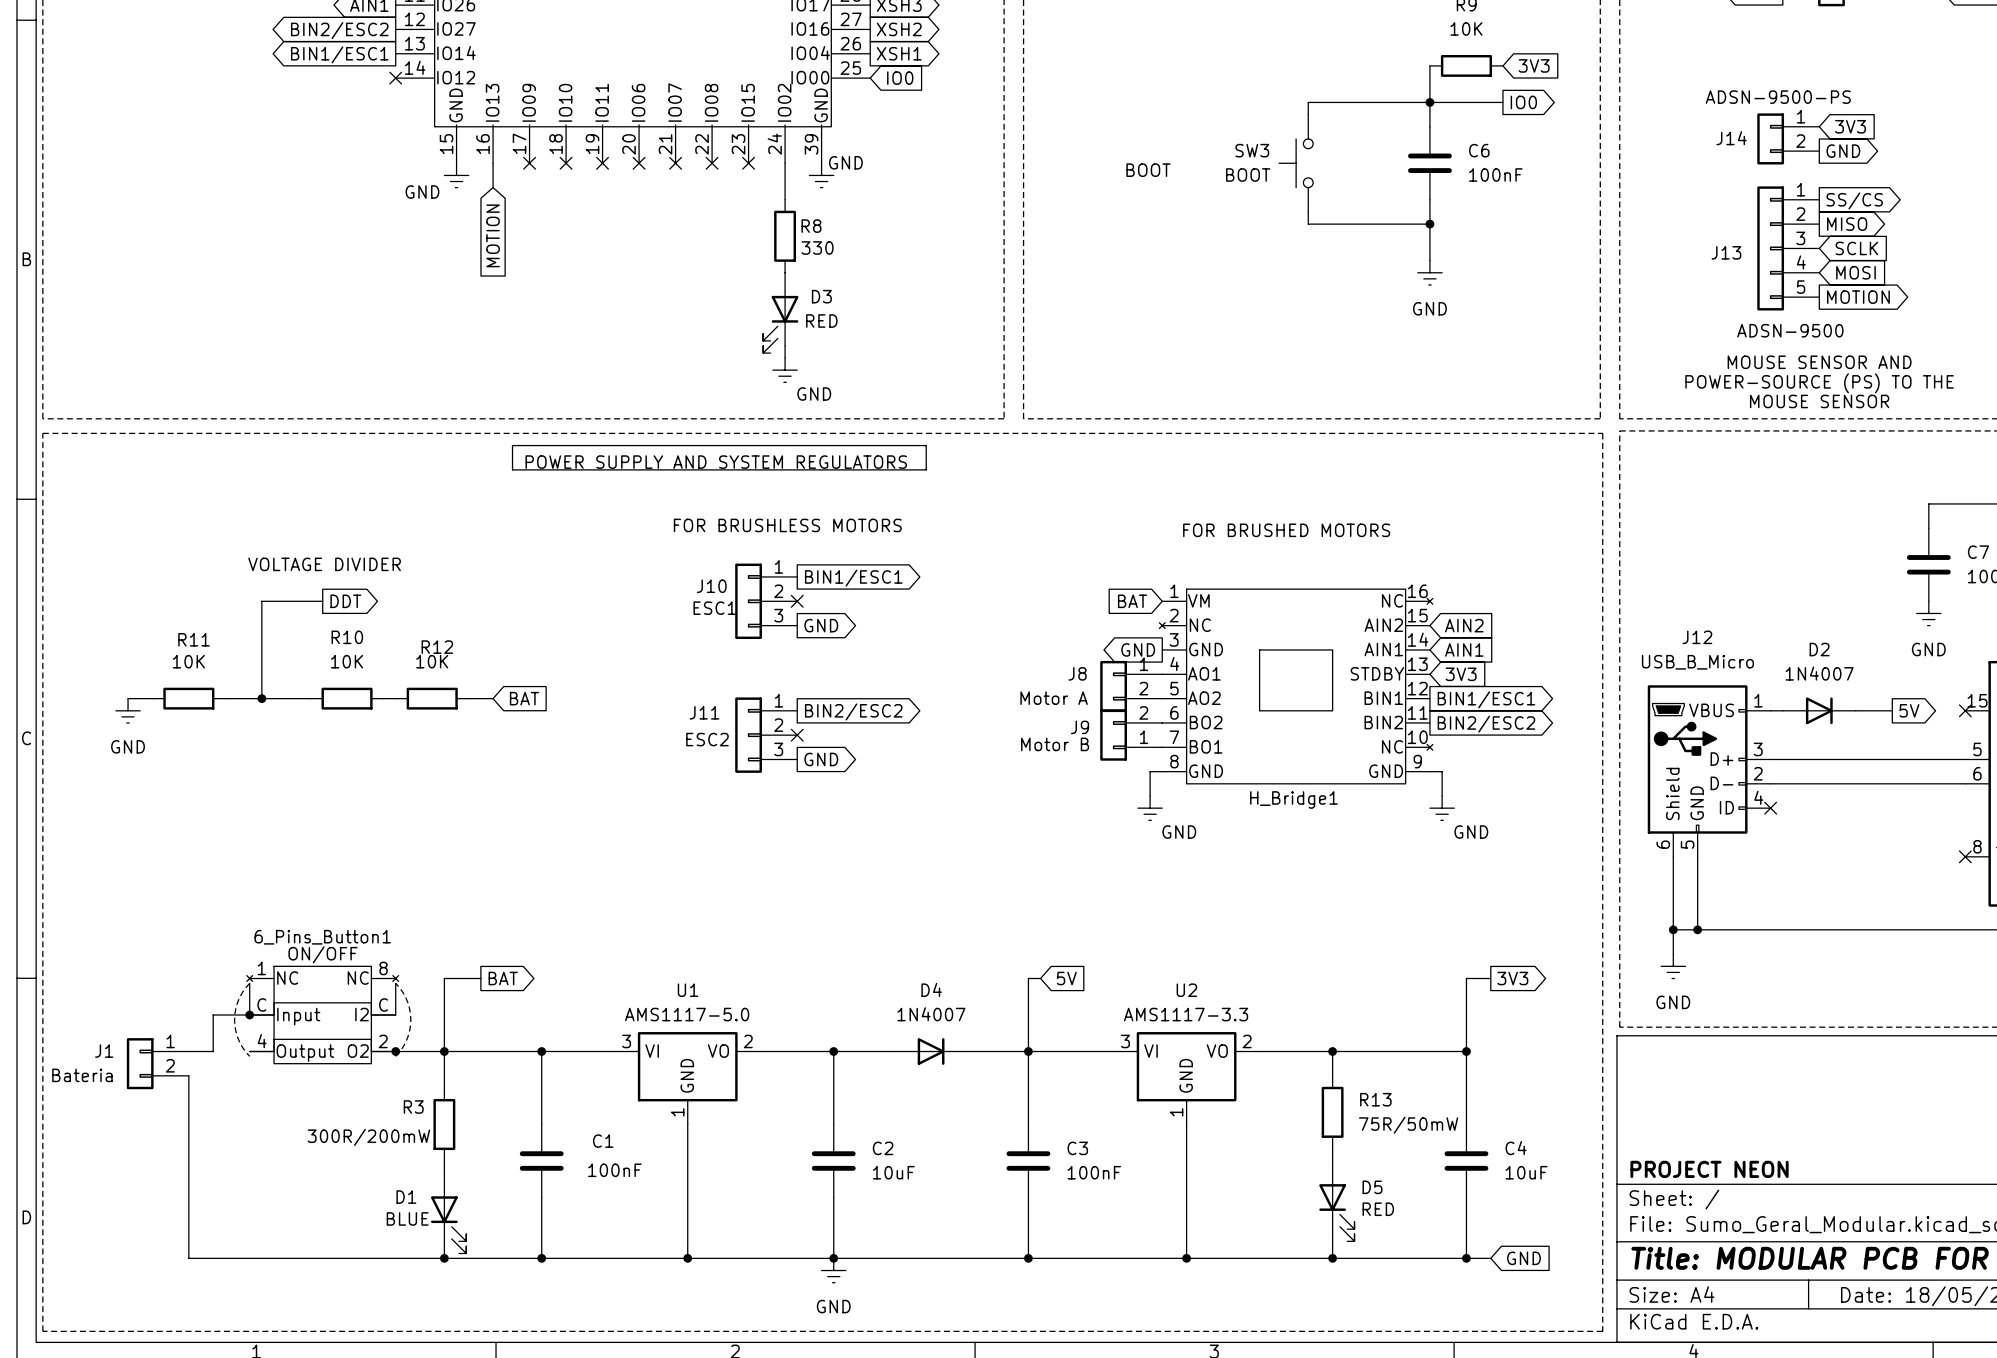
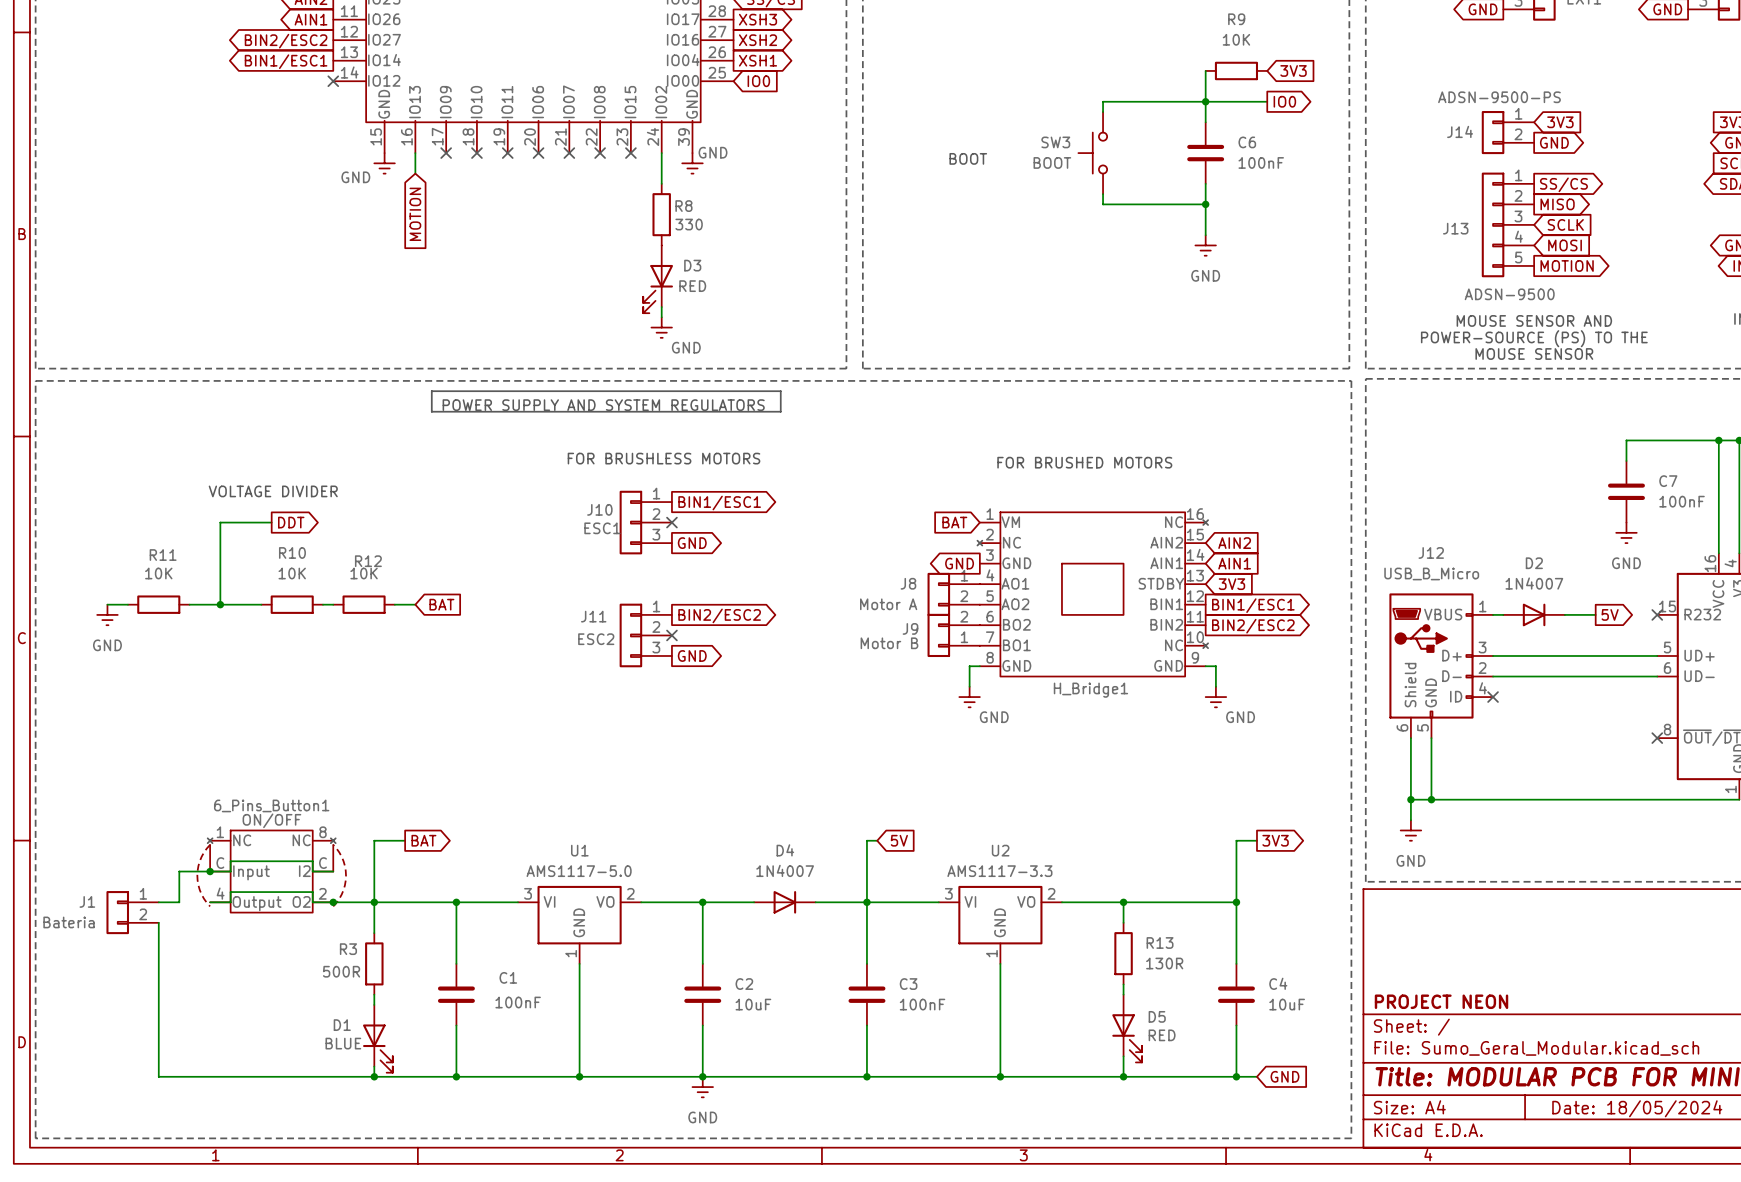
R13 value: 75R/50mW (1408, 1125) -> 130R (1164, 963)
R3 value: 300R/200mW (368, 1137) -> 500R (341, 971)

